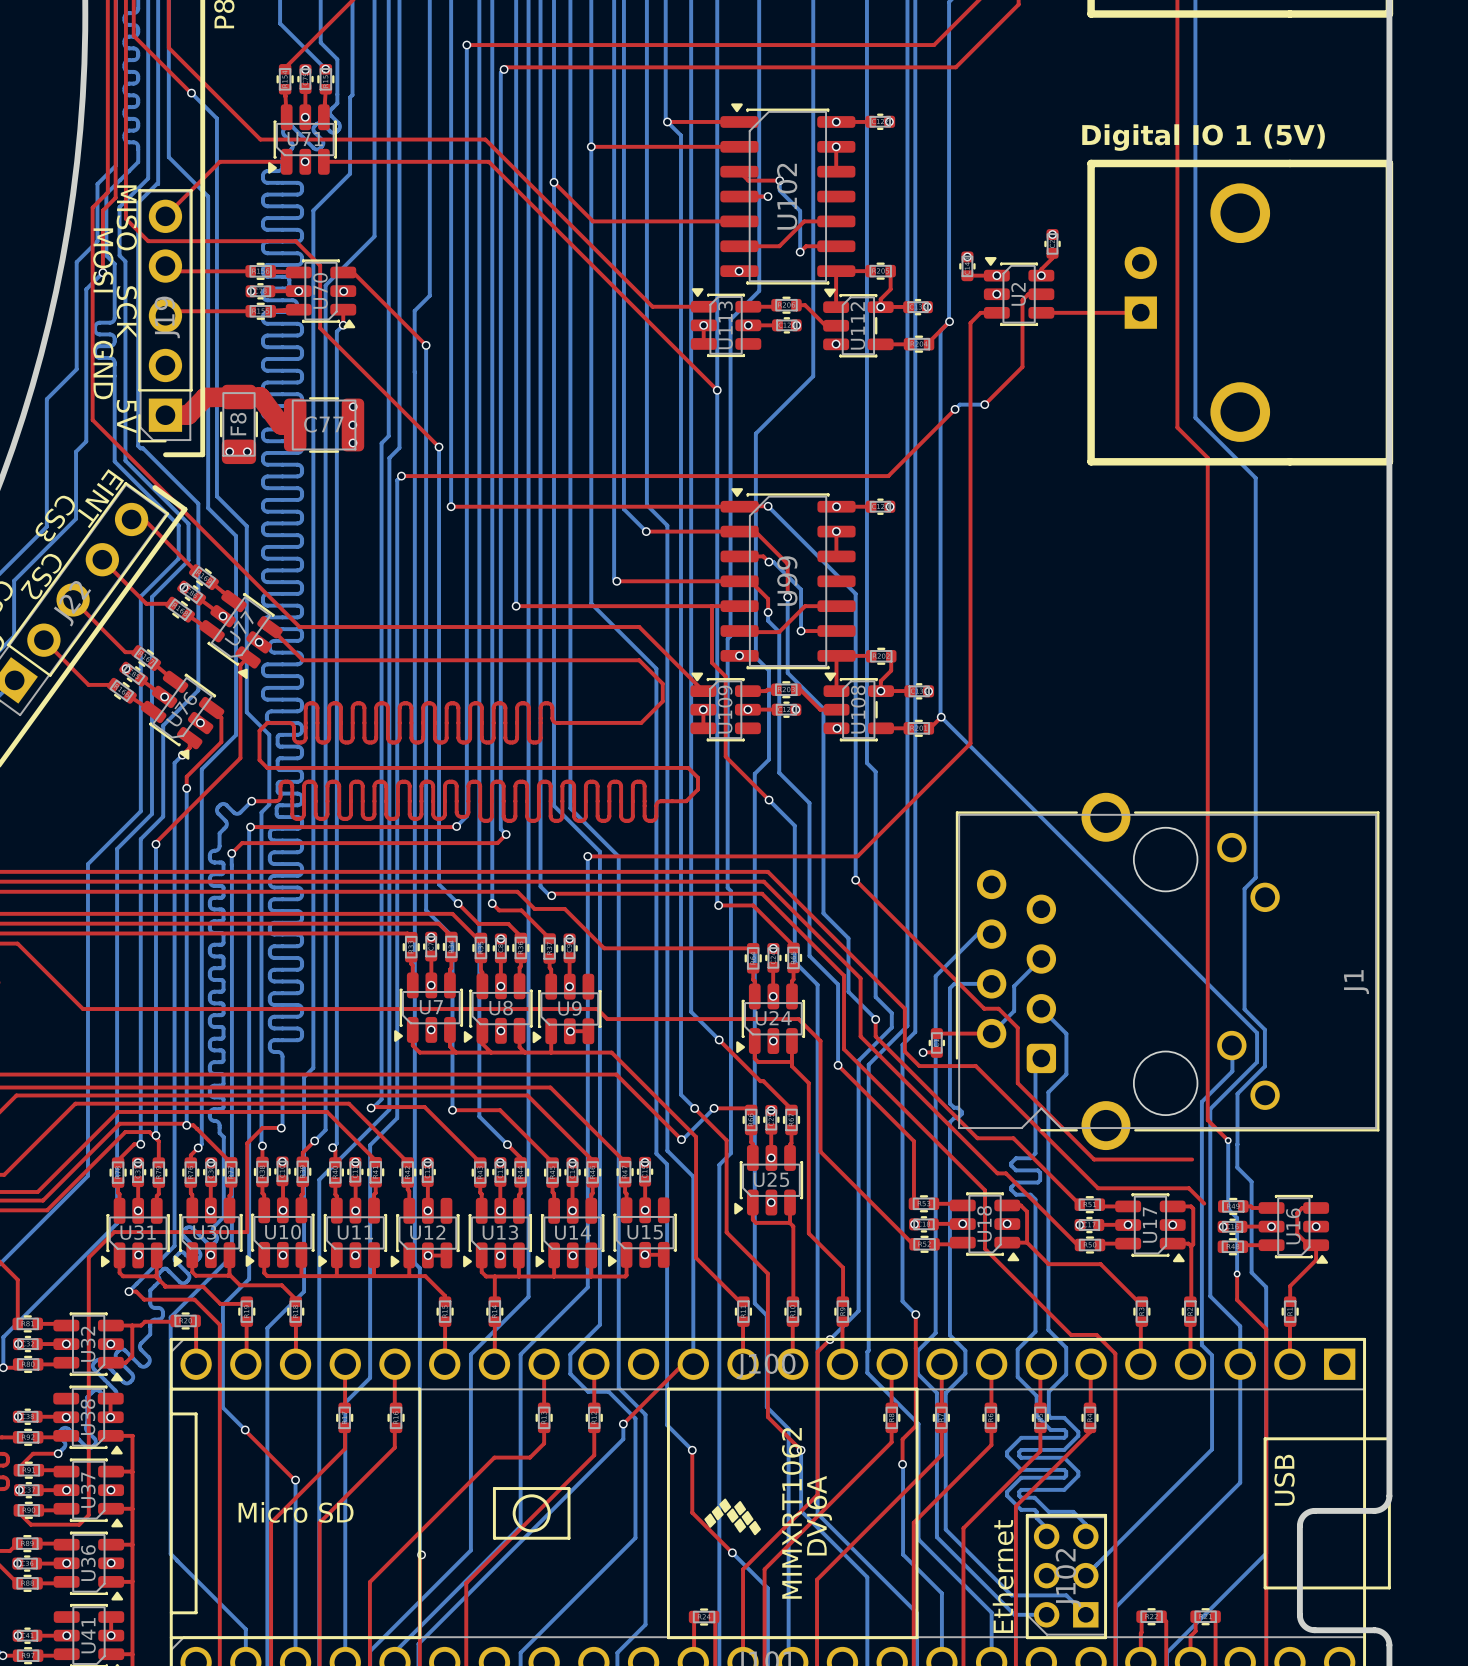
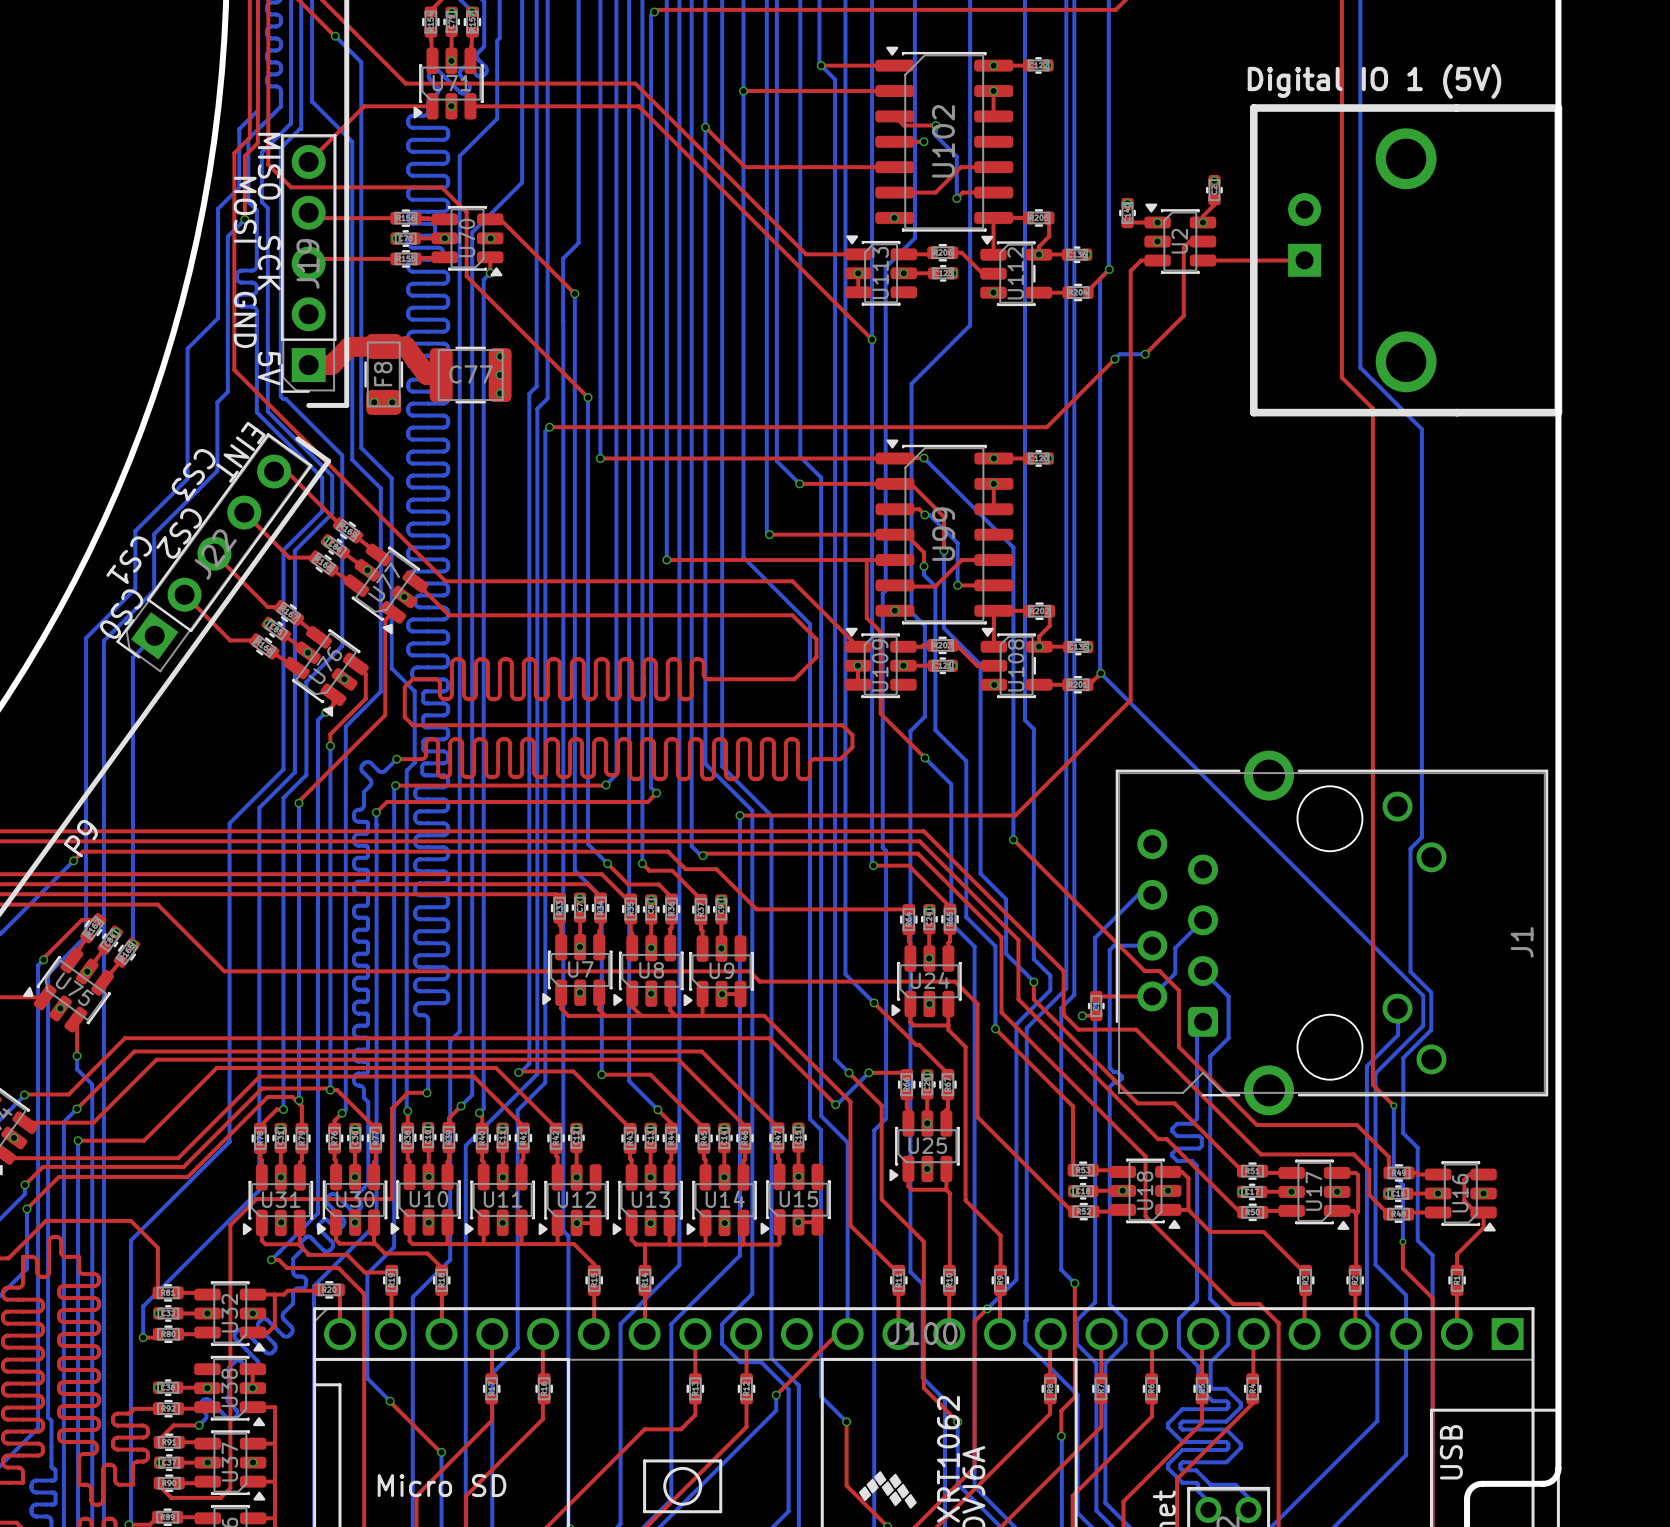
top track: none -> (1357, 1125) (1388, 1156) (1388, 1172)
top track: none -> (1369, 1170) (1369, 1195) (1388, 1214)

